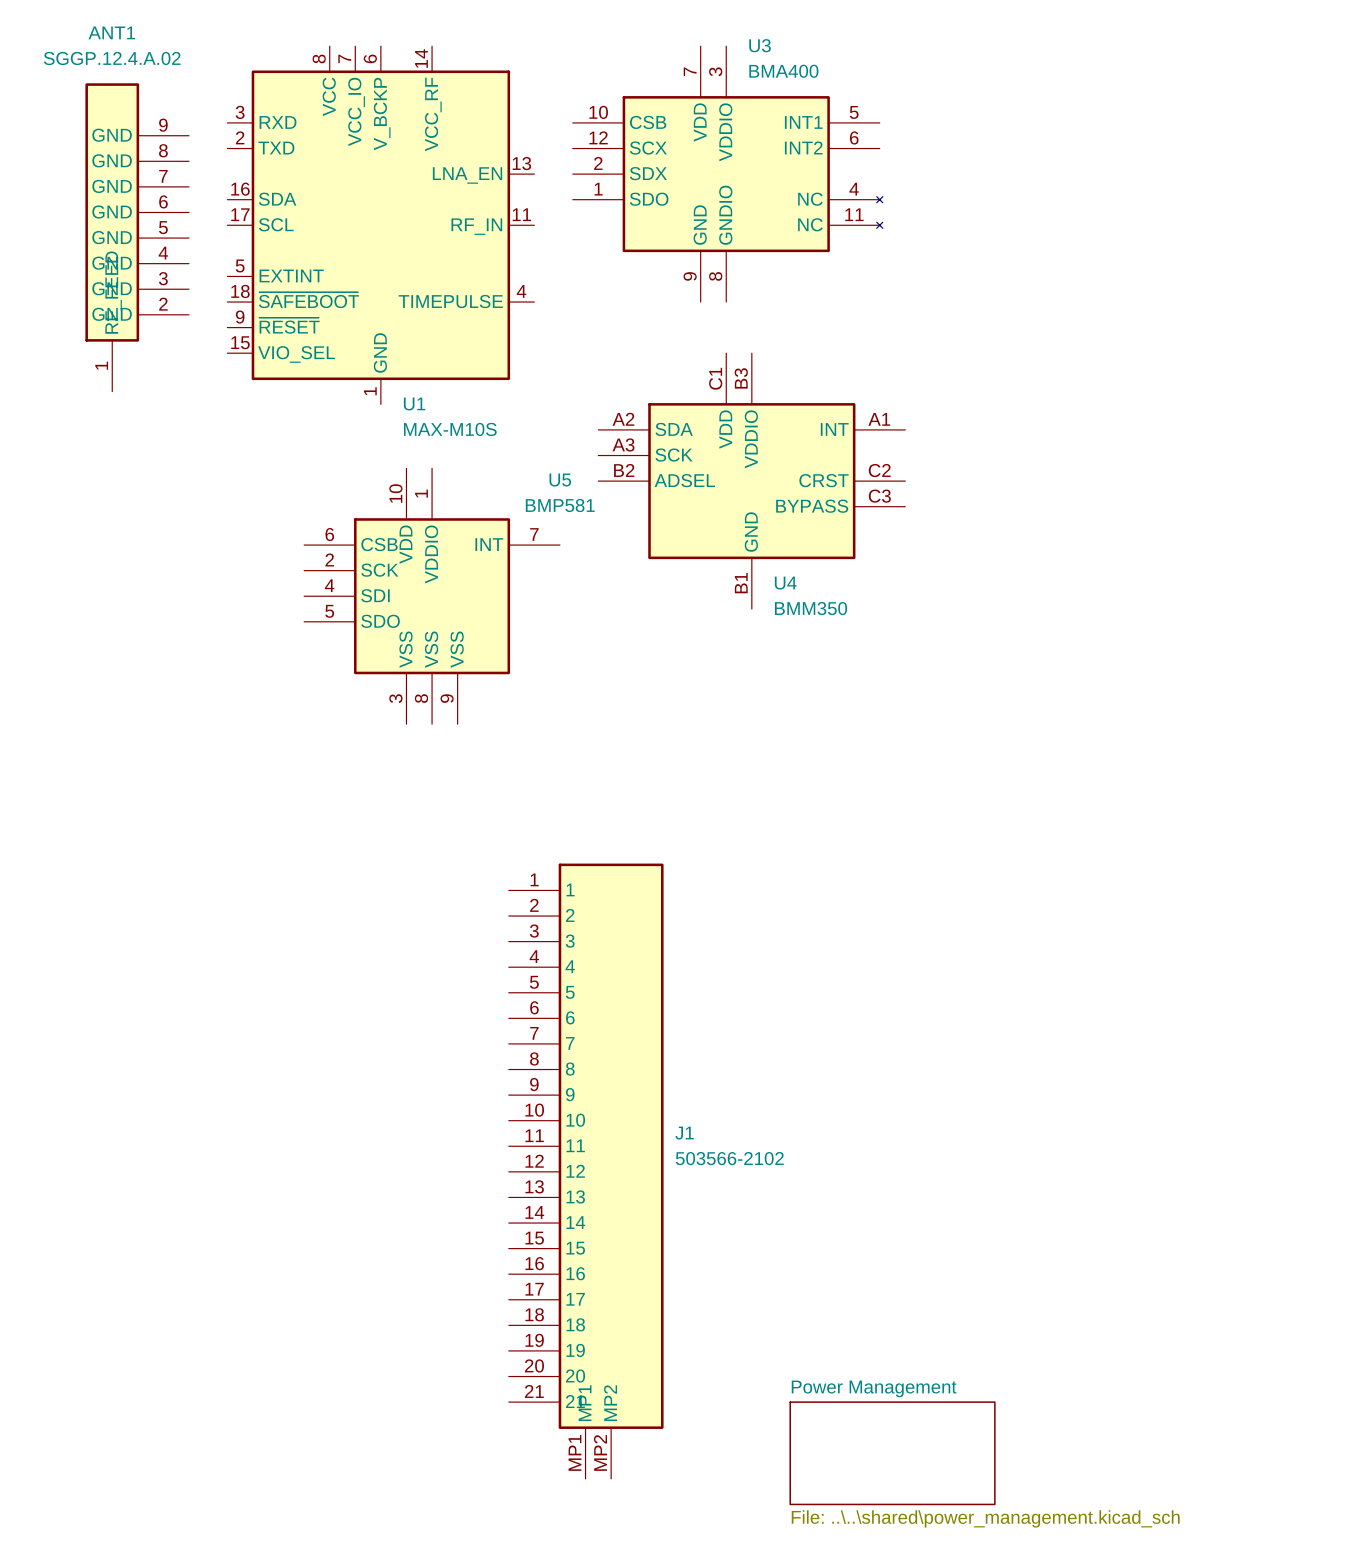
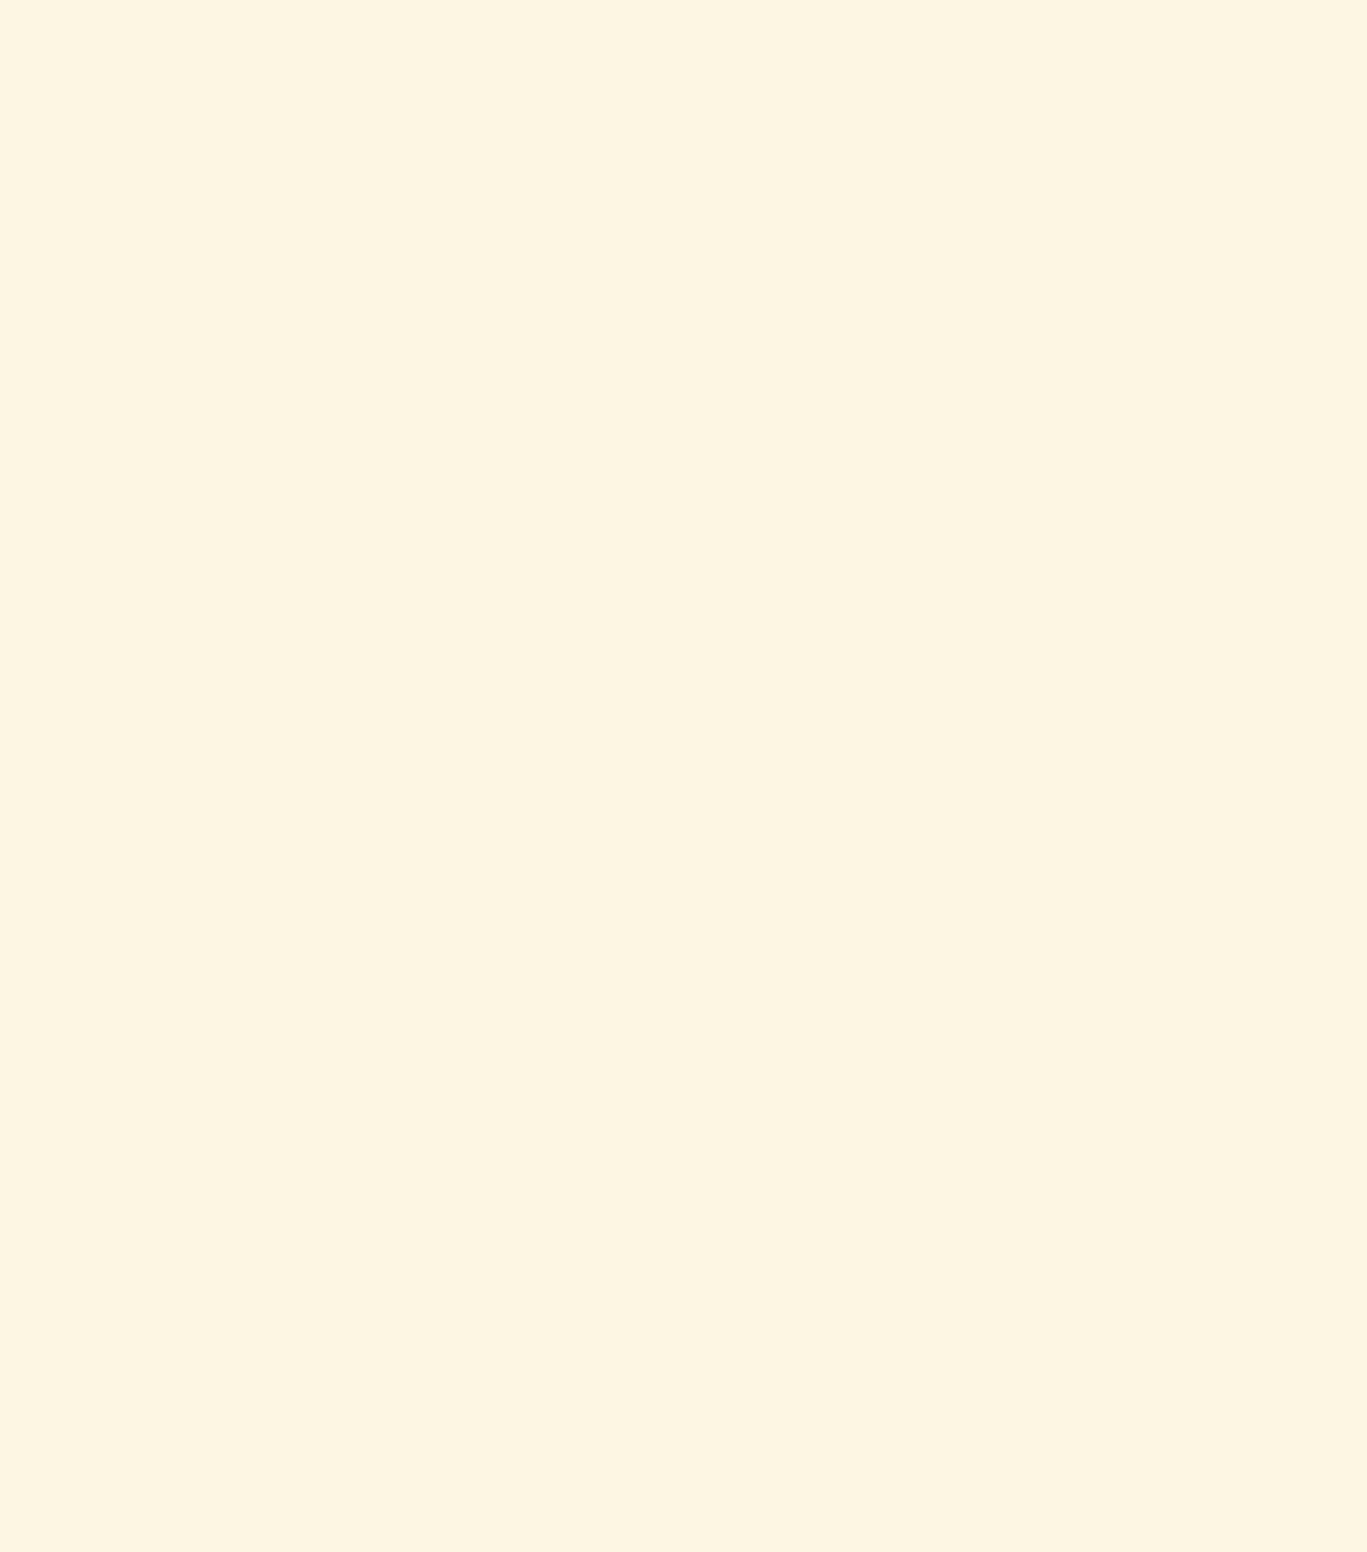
U3: BMA400 (727, 174) -> none
U1: MAX-M10S (380, 225) -> none
ANT1: SGGP.12.4.A.02 (137, 237) -> none
U4: BMM350 (751, 481) -> none
U5: BMP581 (432, 596) -> none
J1: 503566-2102 (586, 1171) -> none
sheet Power Management: File: ..\..\shared\power_management.kicad_sch (892, 1453) -> none

